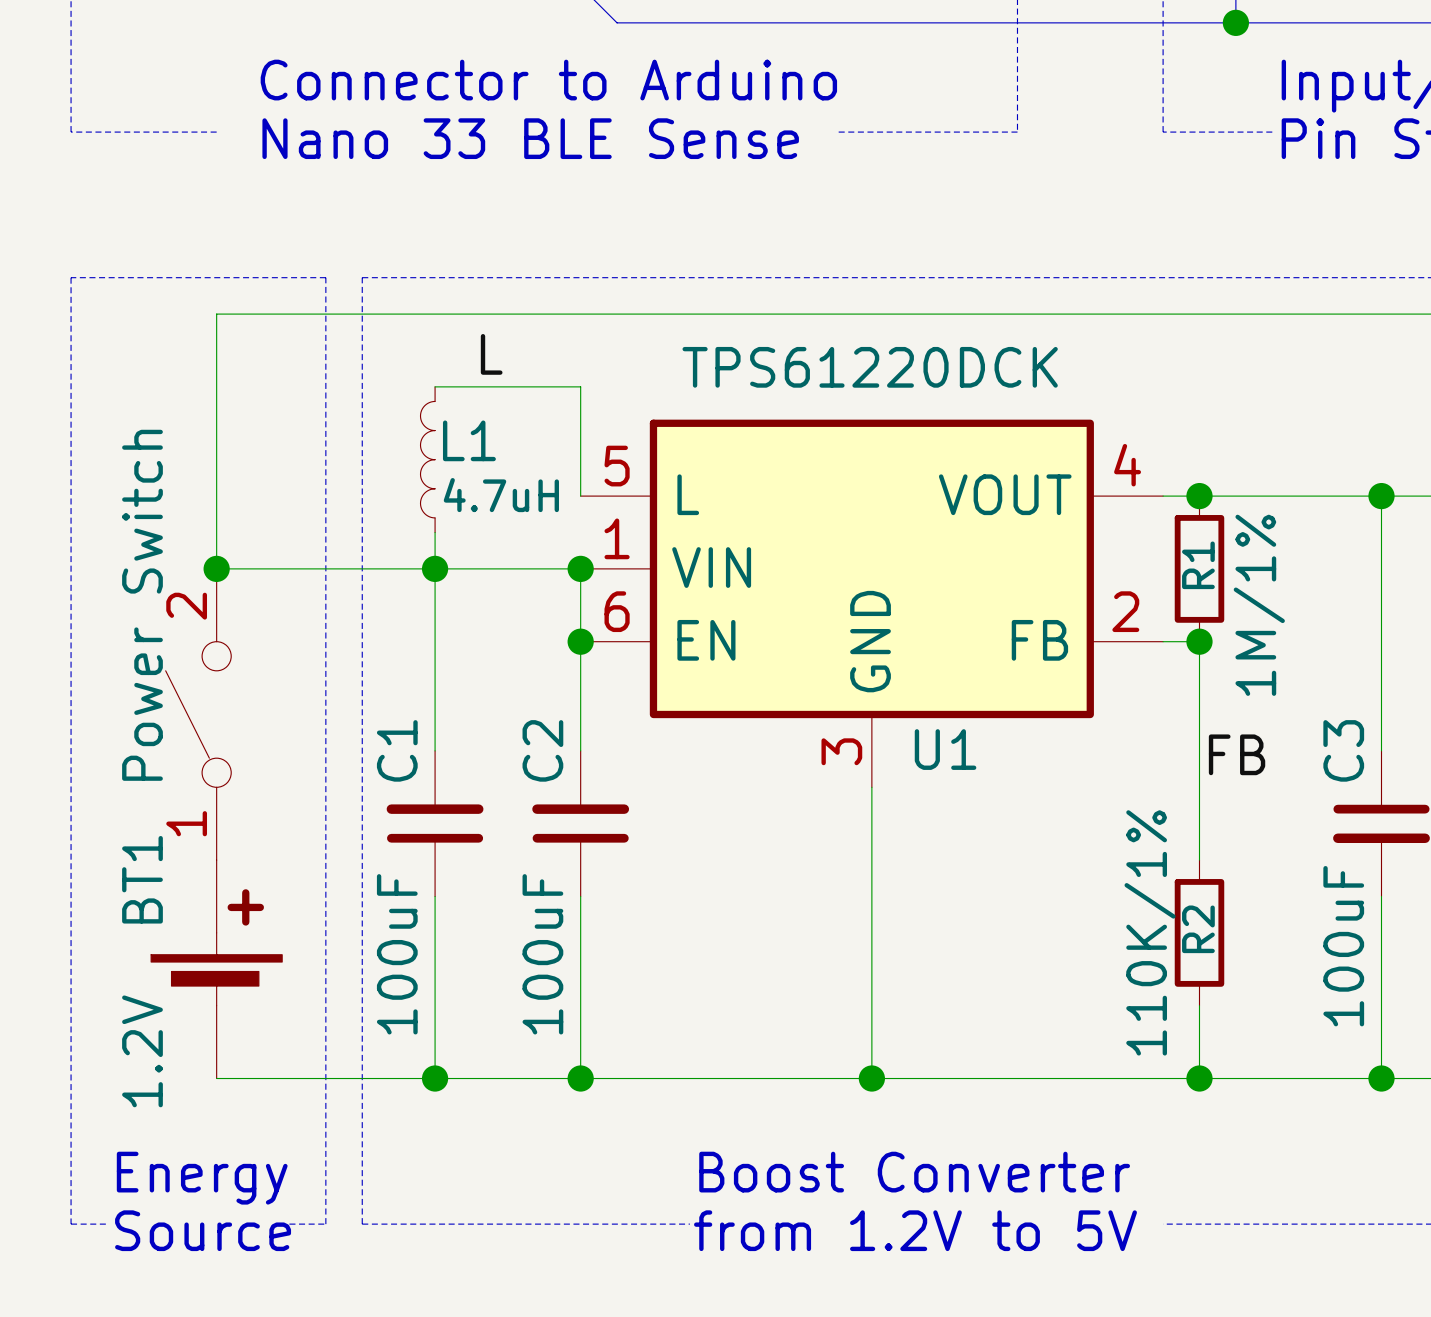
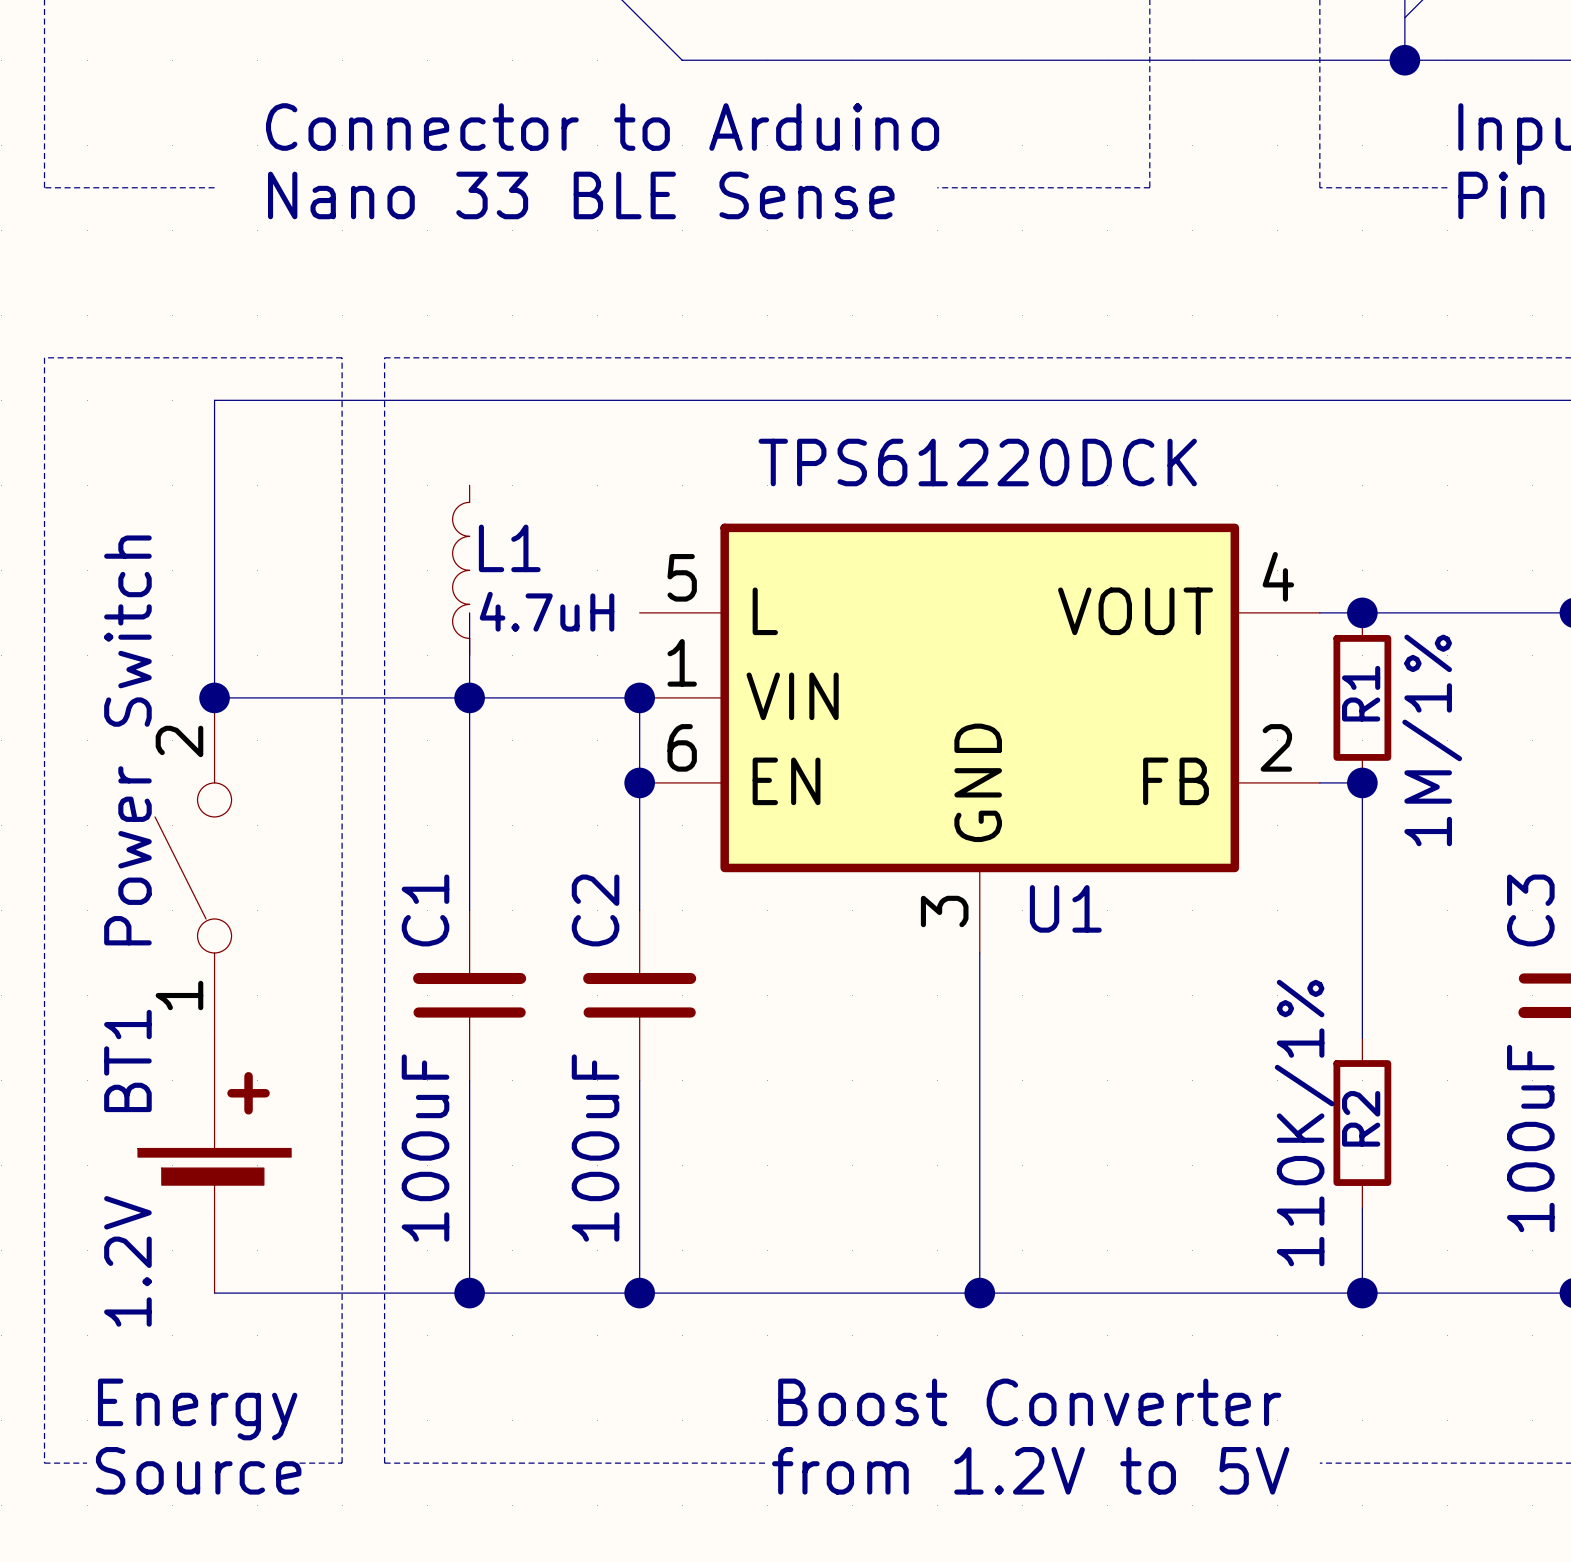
label: L (491, 354) -> none
wire: (435, 386) (580, 386) (580, 496) -> none
wire: none -> (469, 612) (469, 655)
label: FB (1237, 754) -> none

